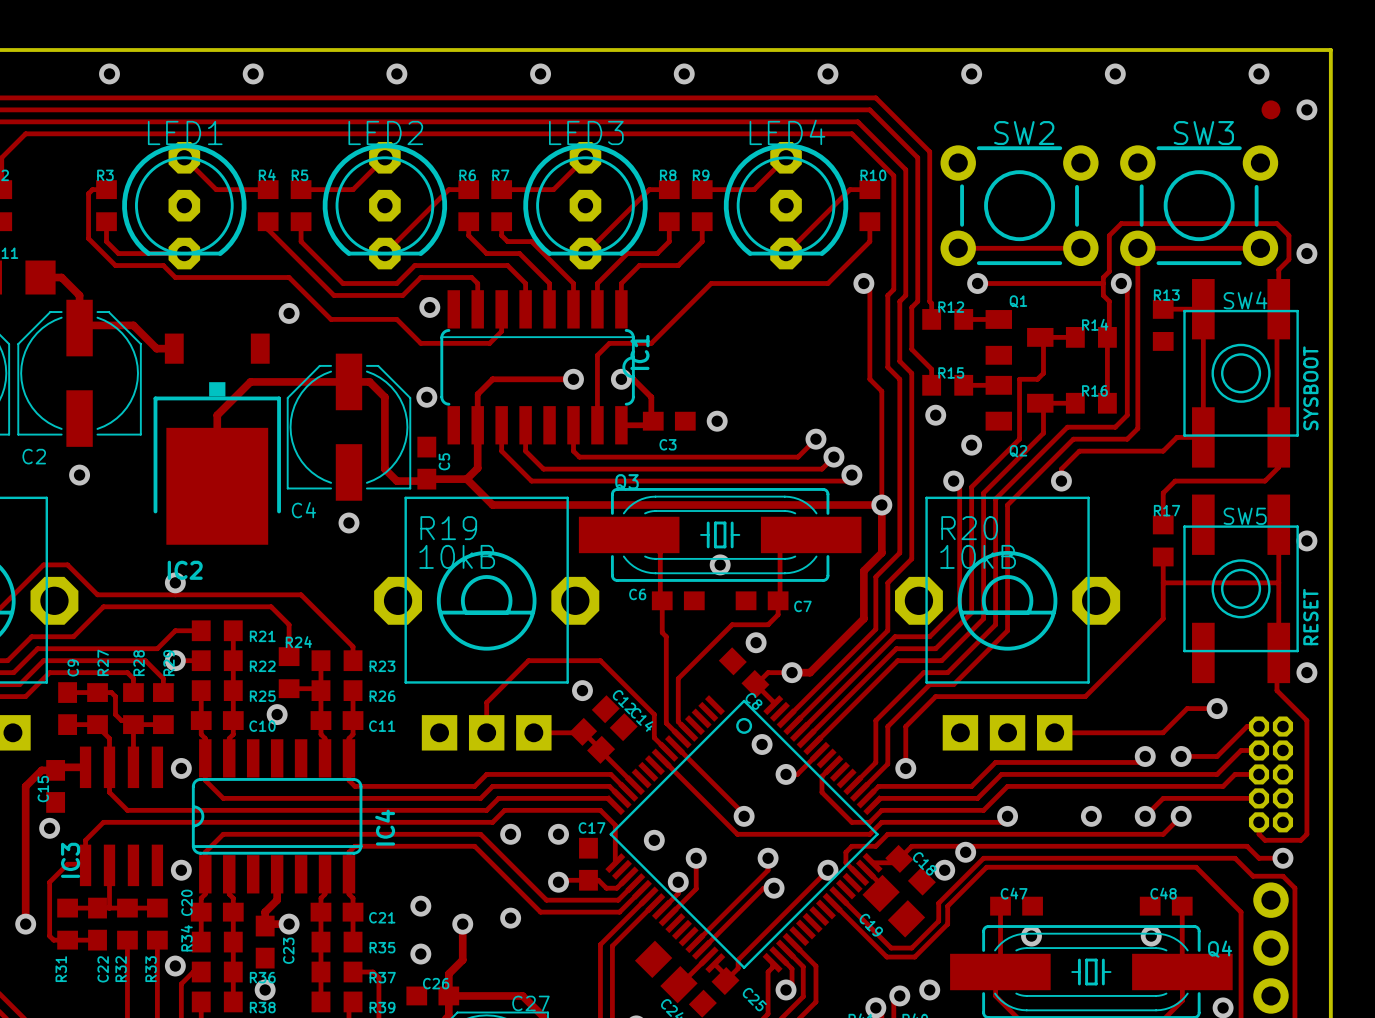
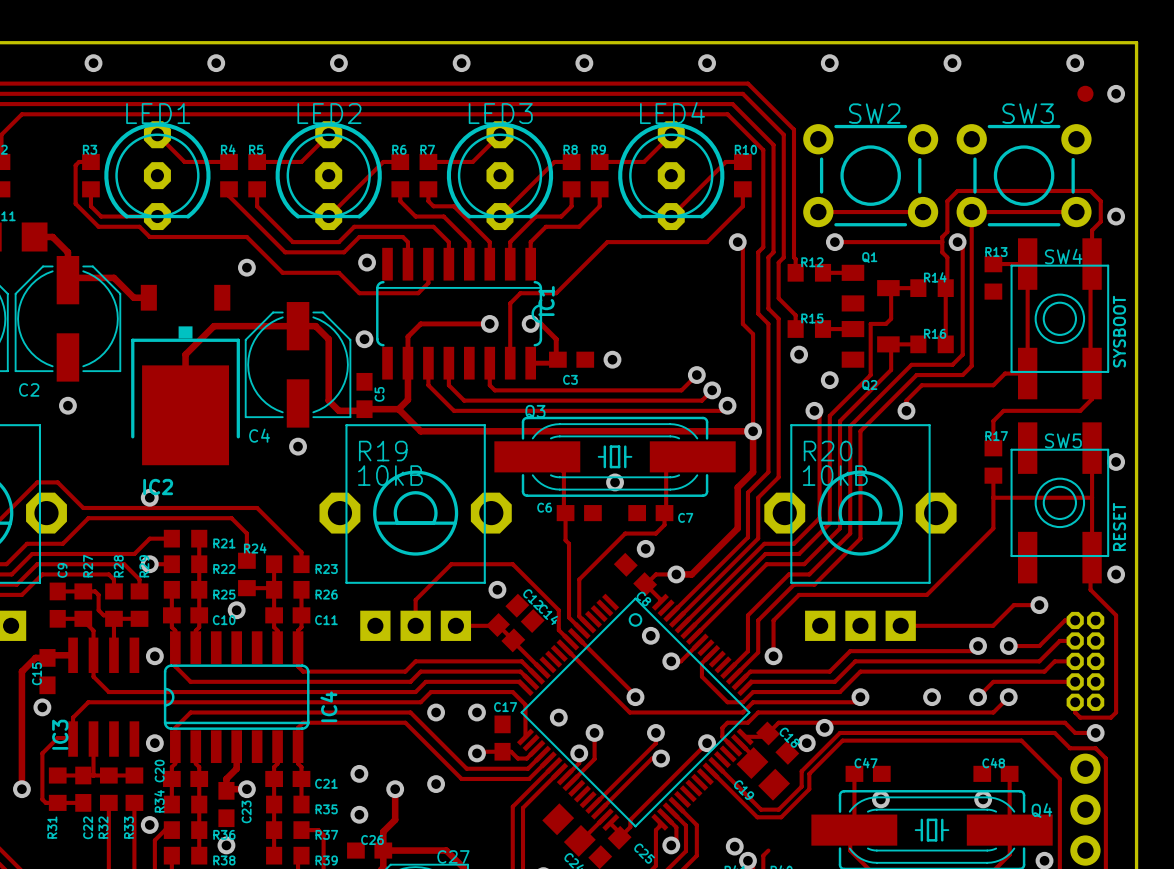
via: (929, 989) -> none
via: none -> (734, 846)
via: (899, 995) -> none

